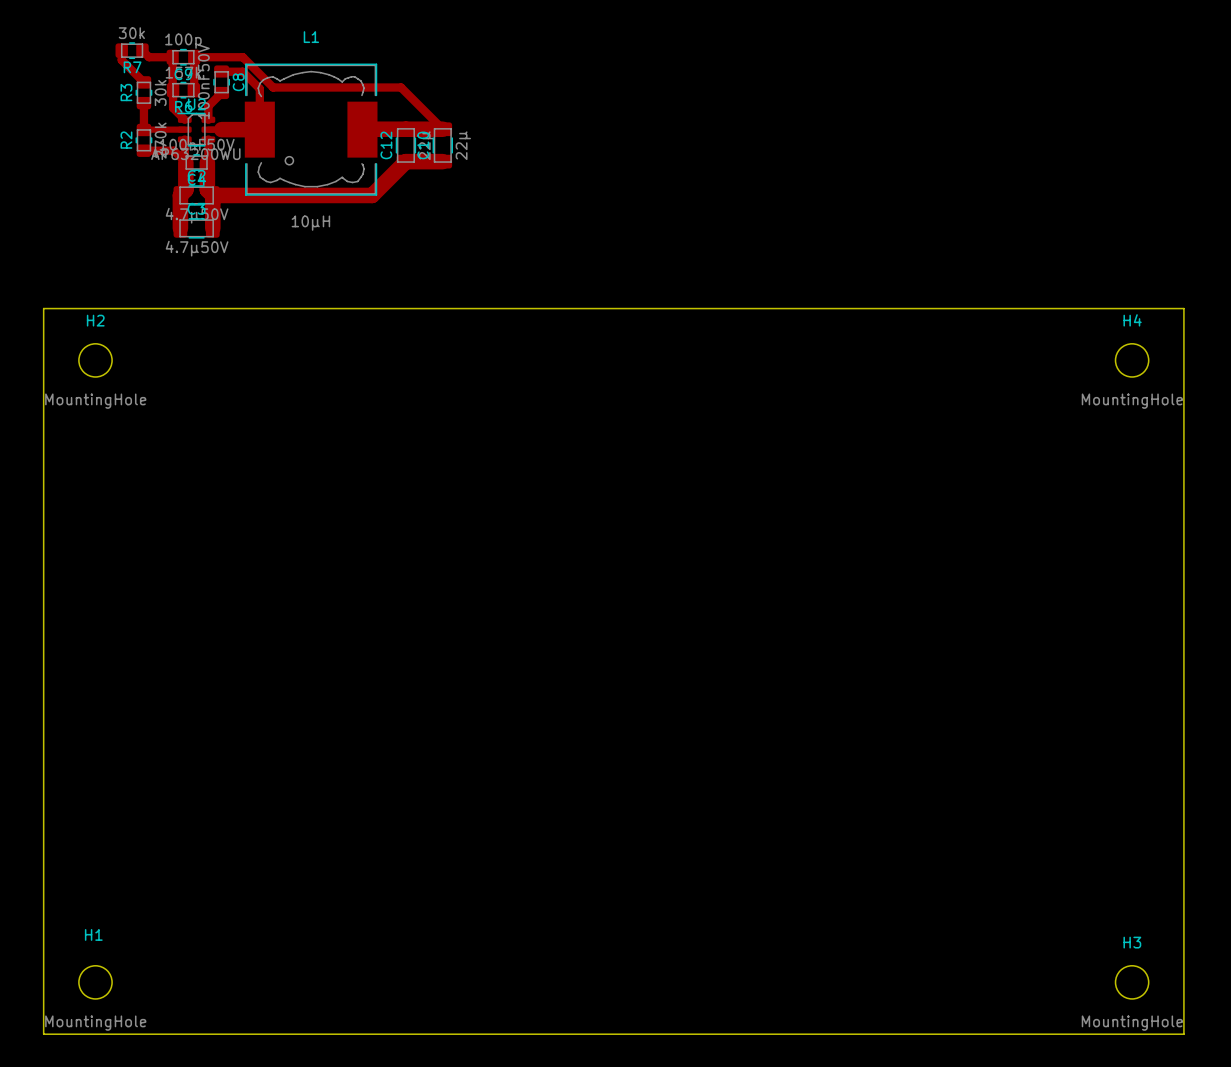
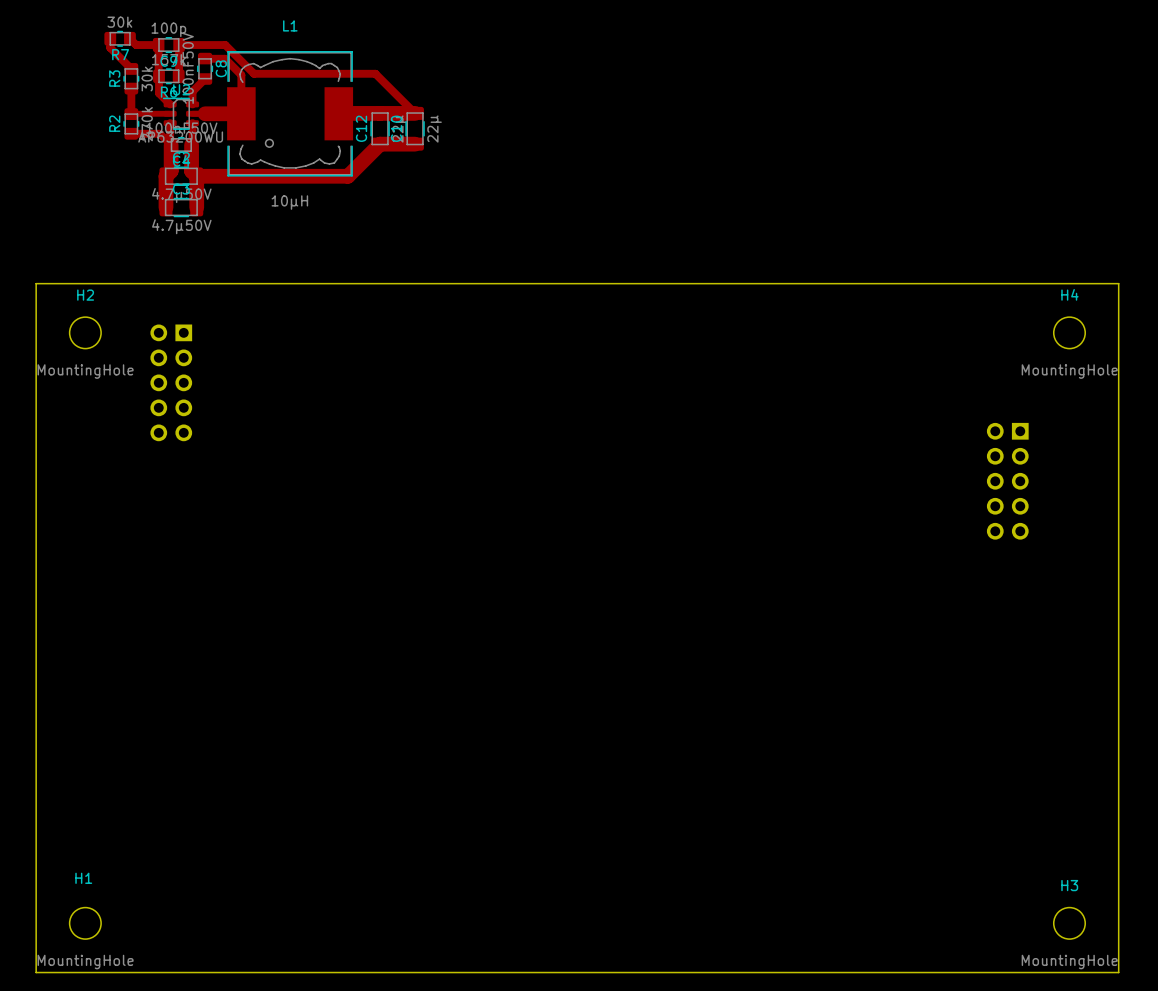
part: none -> (171, 382)
part: none -> (1007, 481)

